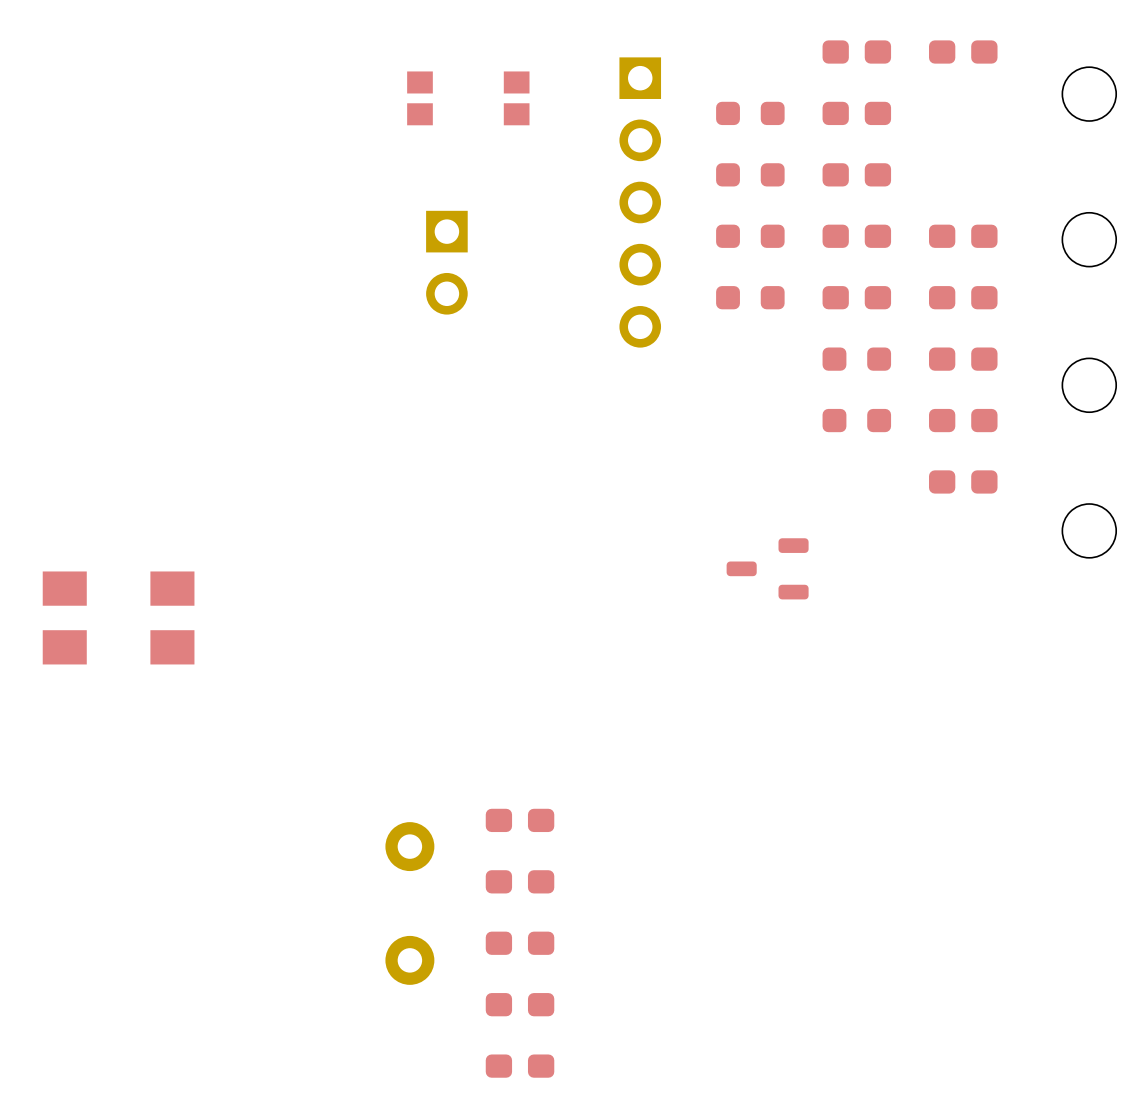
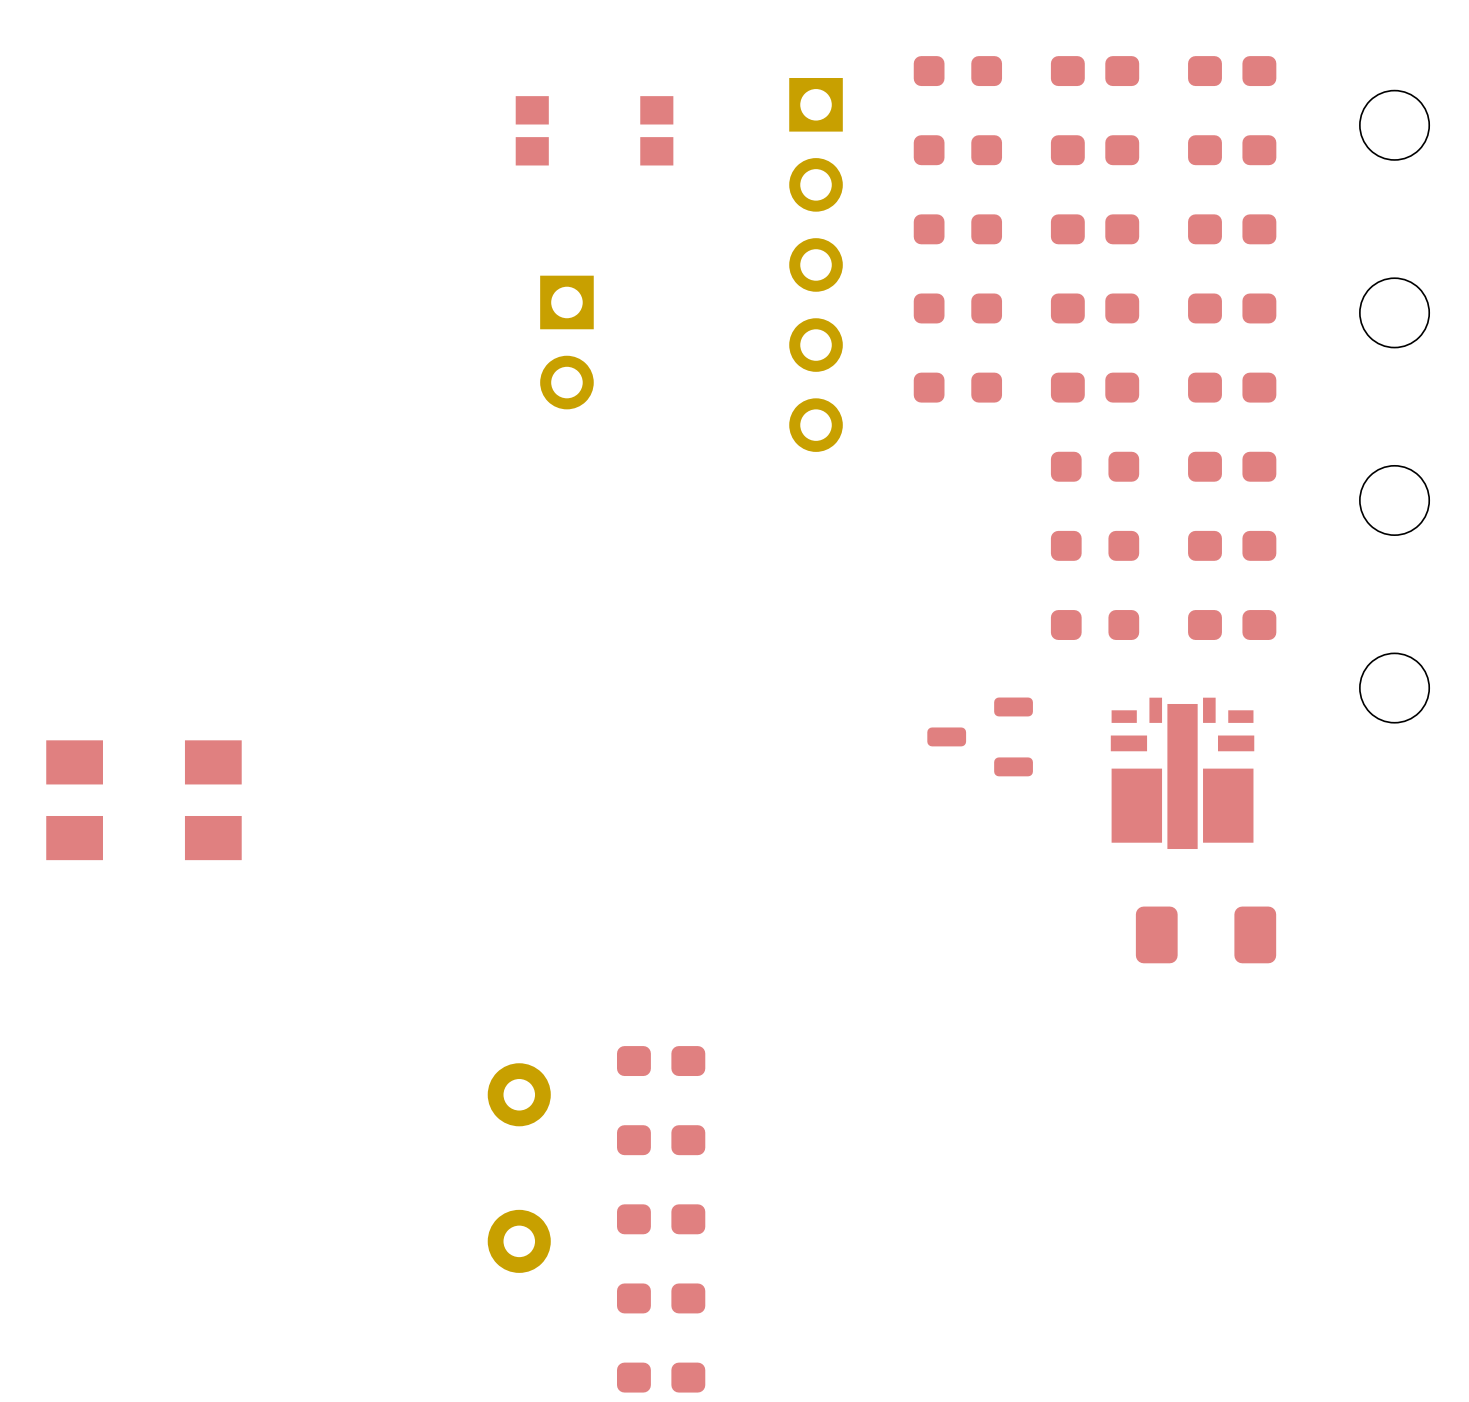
part: none -> (957, 71)
part: none -> (1232, 150)
part: none -> (1232, 229)
part: none -> (1095, 625)
part: none -> (1182, 773)
part: none -> (1206, 934)

